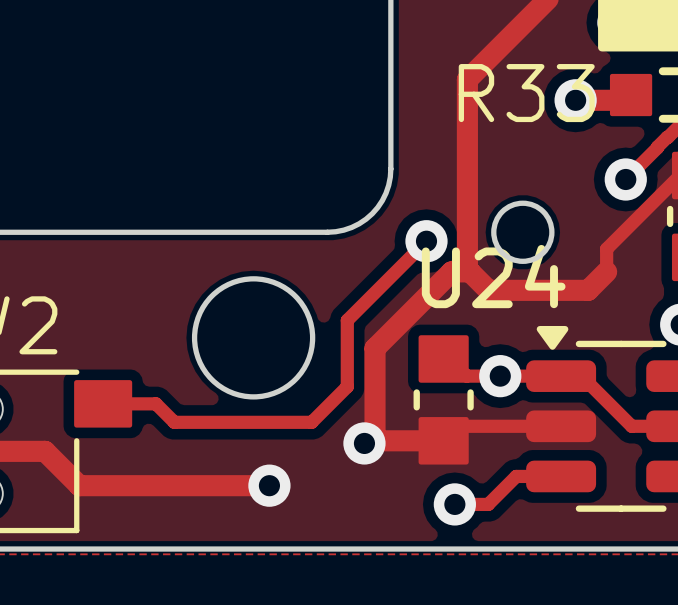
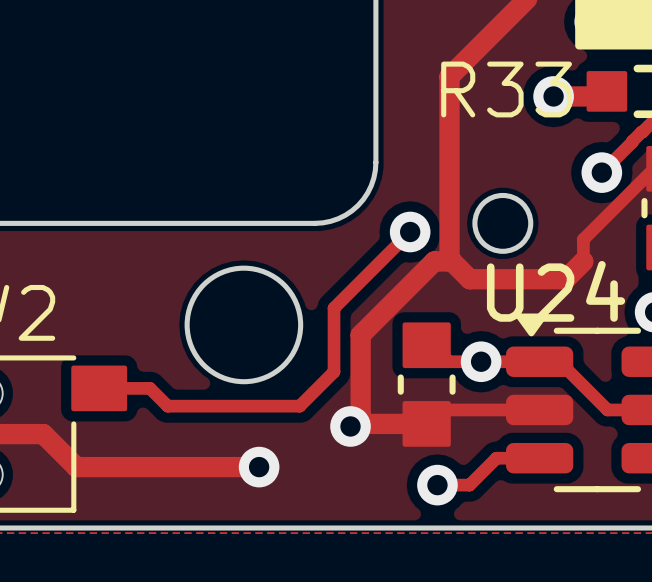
U24 name position: U24 (493, 276) -> U24 (556, 291)

